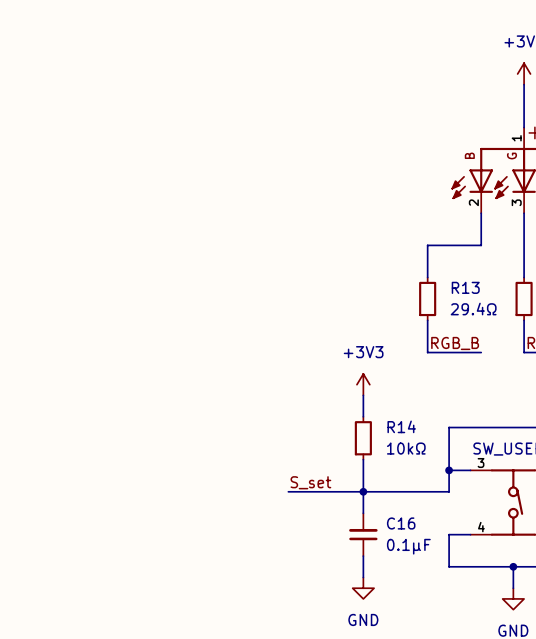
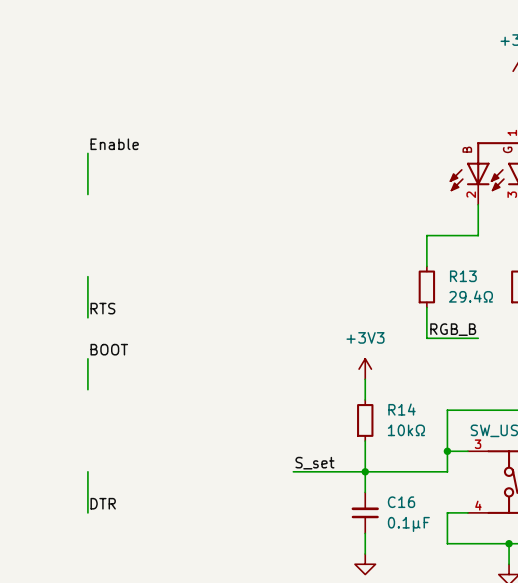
label: none -> Enable (114, 144)
wire: none -> (87, 153) (87, 194)
wire: none -> (87, 276) (87, 317)
label: none -> RTS (102, 308)
label: none -> BOOT (109, 349)
wire: none -> (87, 358) (87, 389)
wire: none -> (87, 471) (87, 512)
label: none -> DTR (103, 503)

